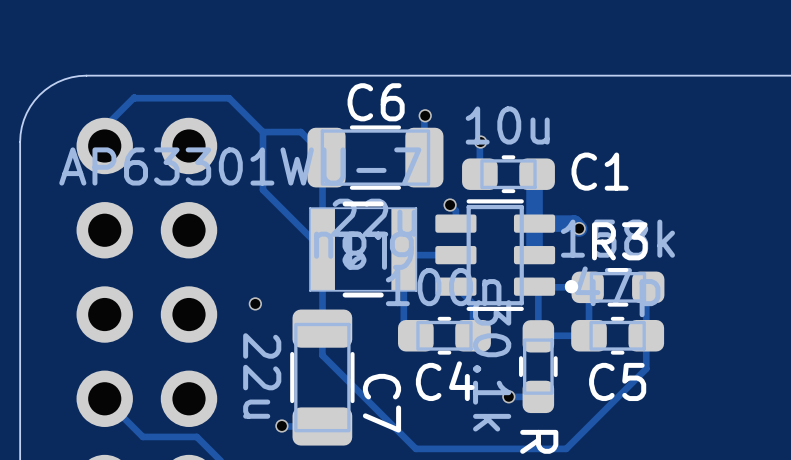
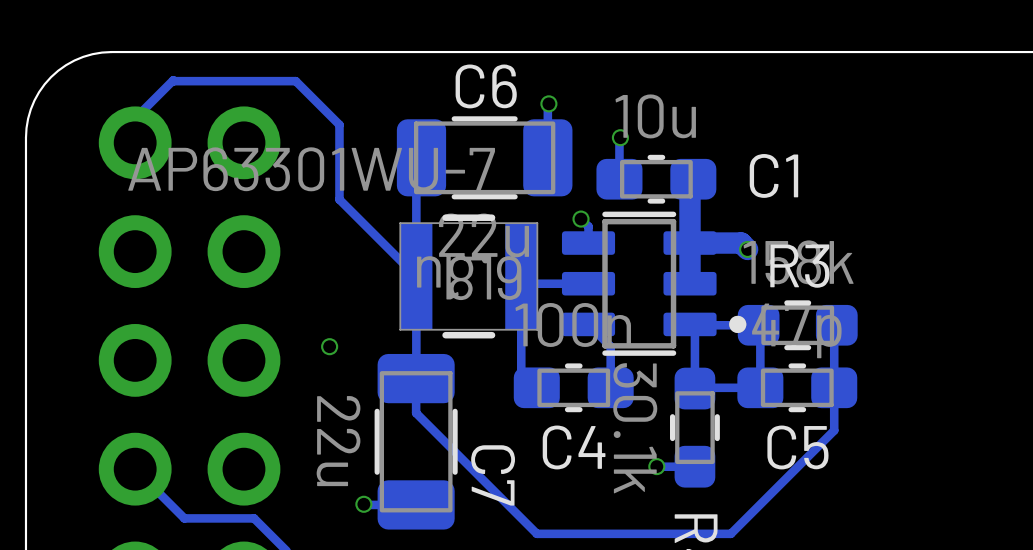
track: (262, 132) (300, 132) (326, 157) -> none

